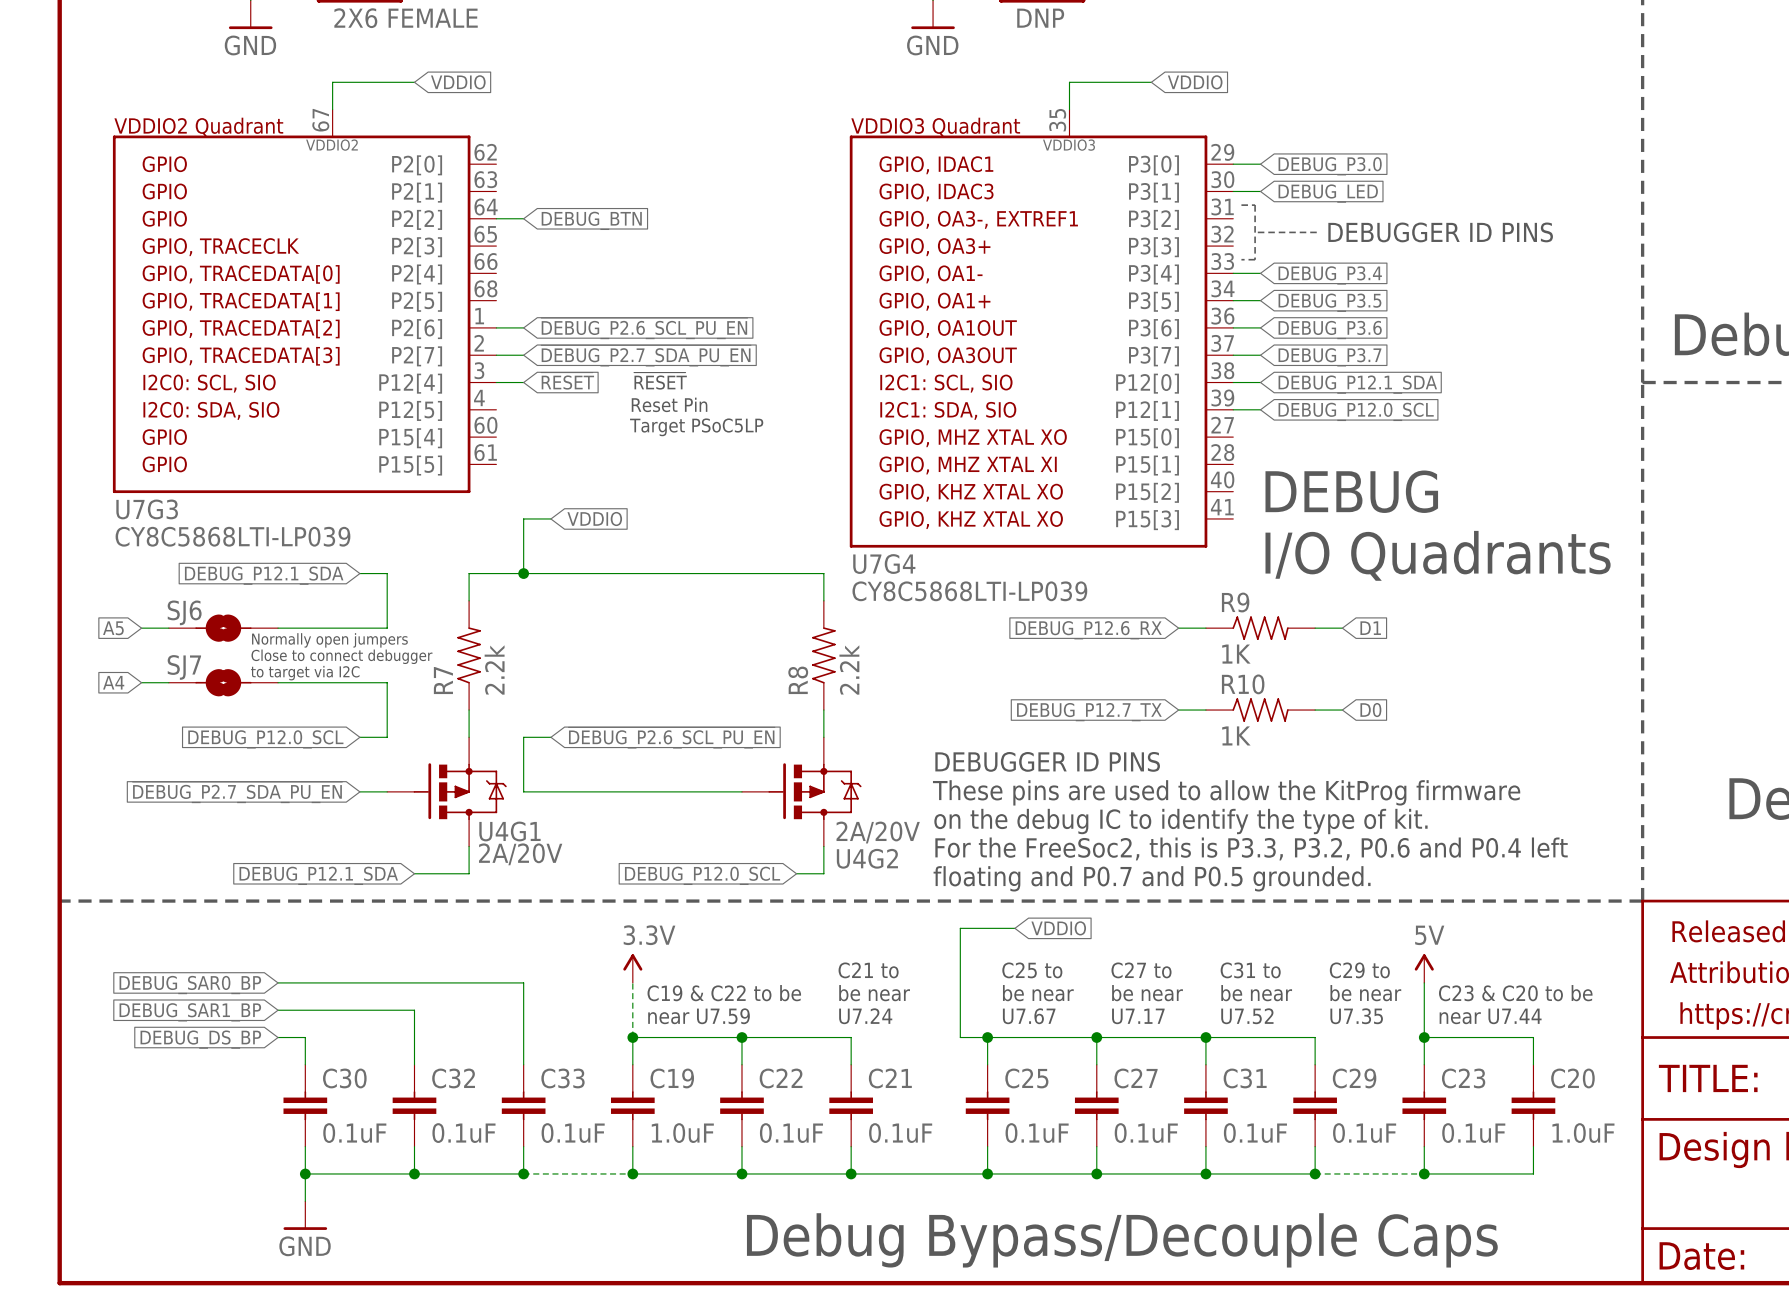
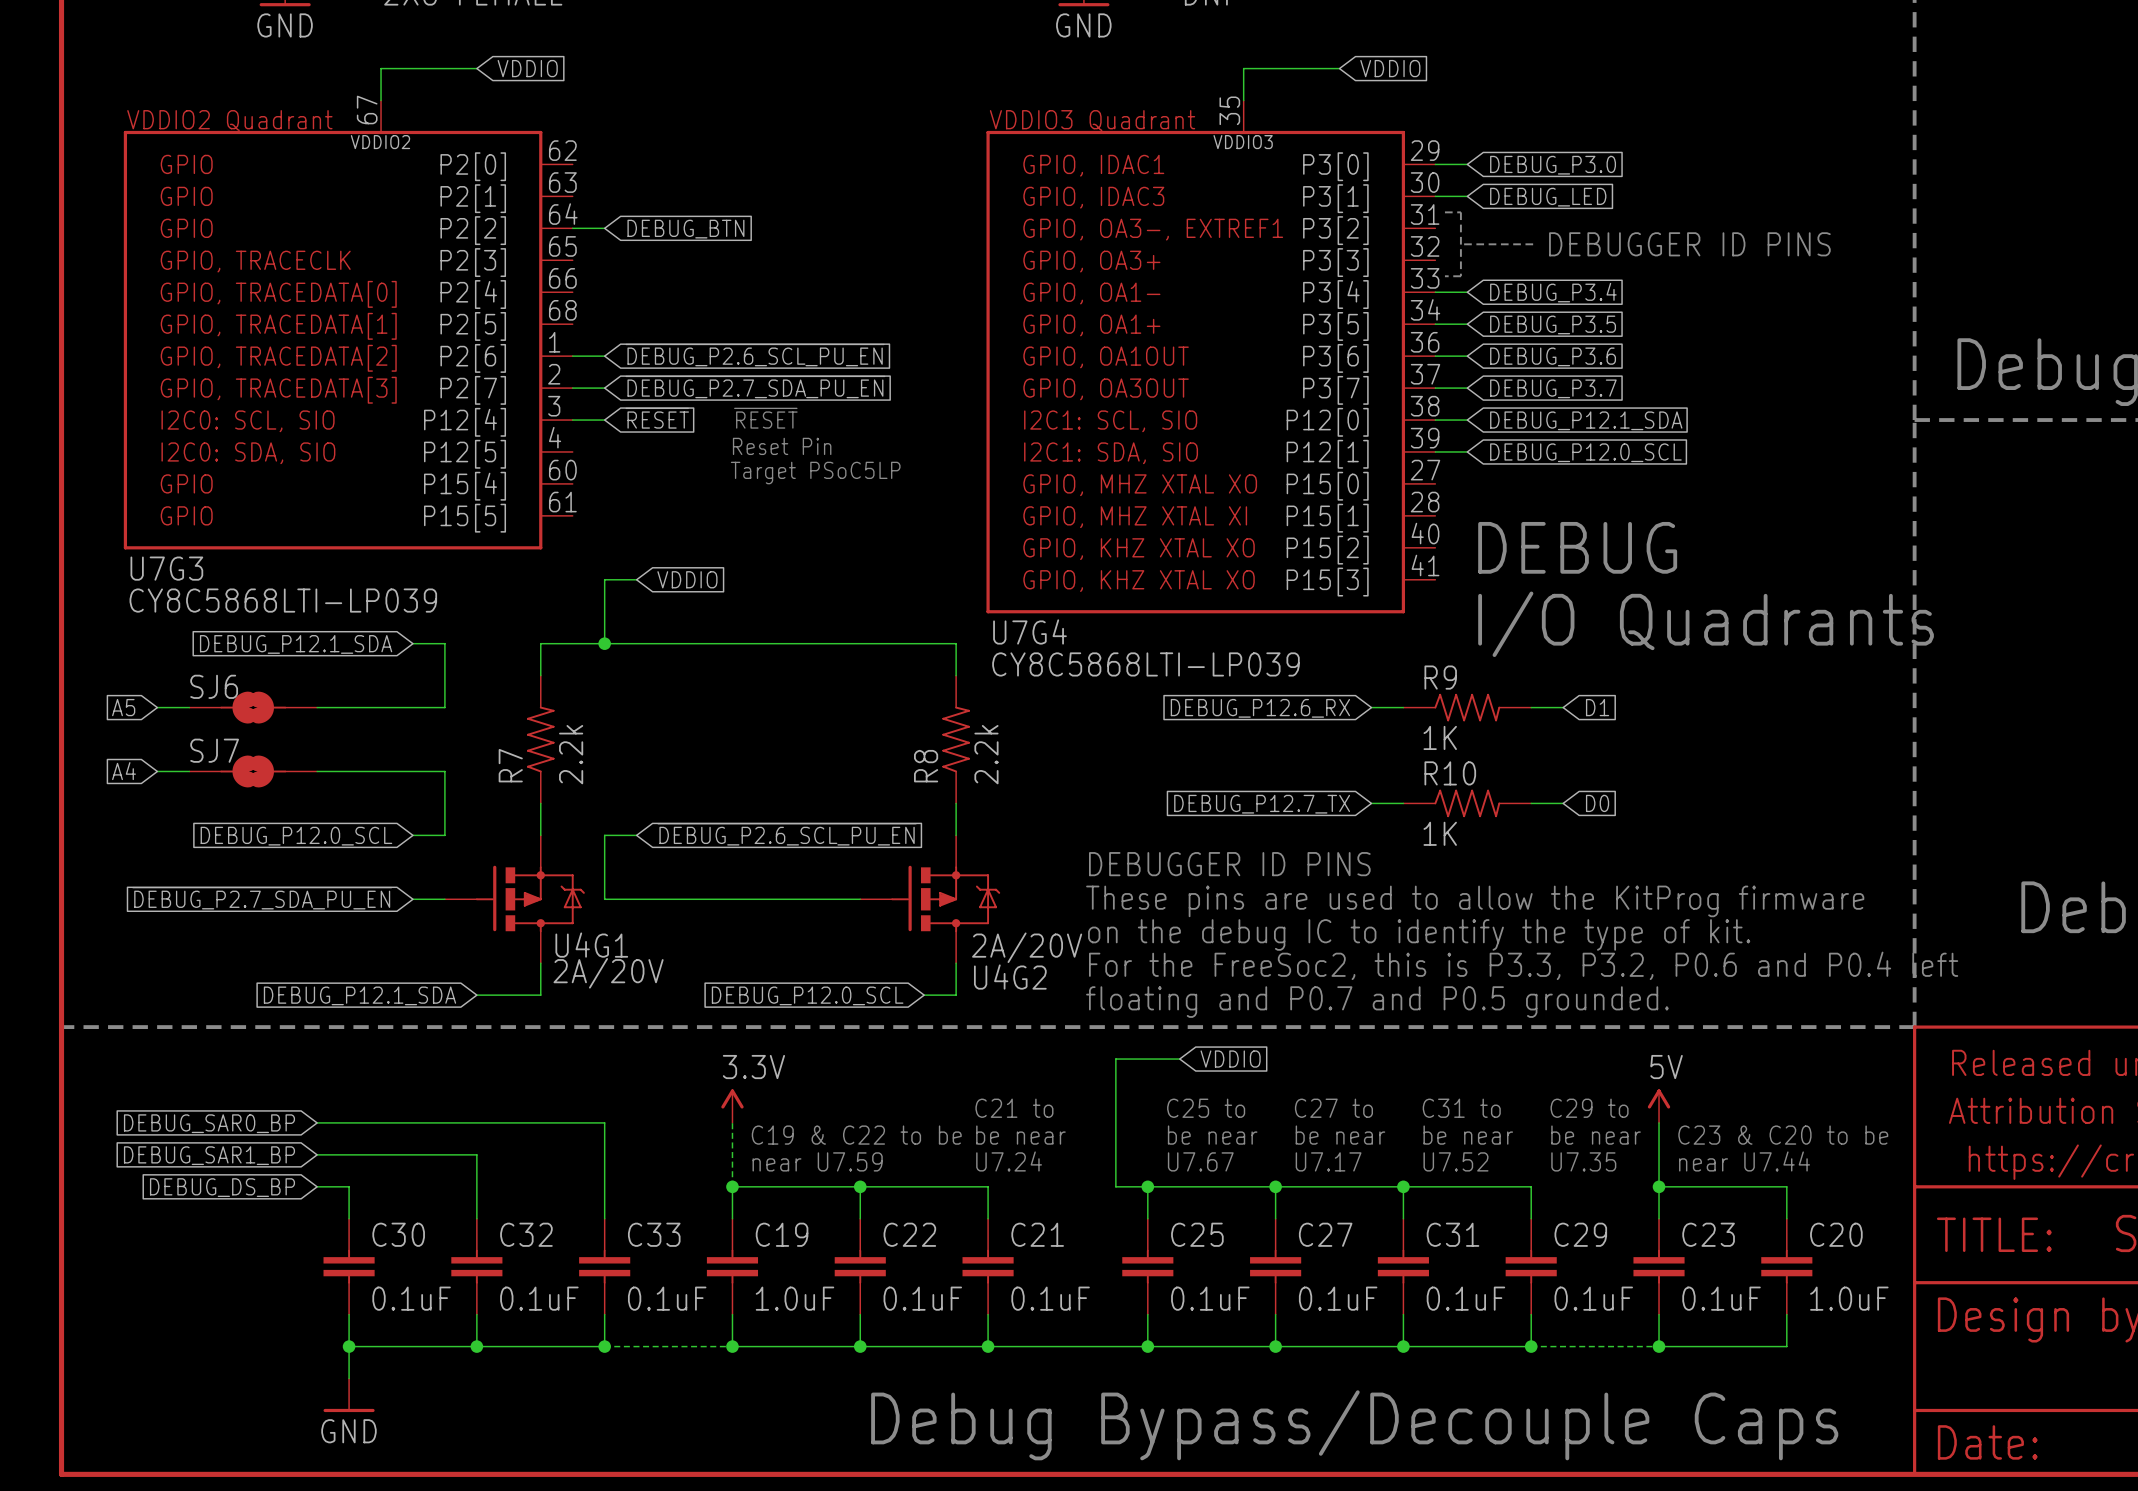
text: Normally open jumpers (329, 640) -> none
text: Close to connect debugger (341, 656) -> none
text: to target via I2C (305, 673) -> none

